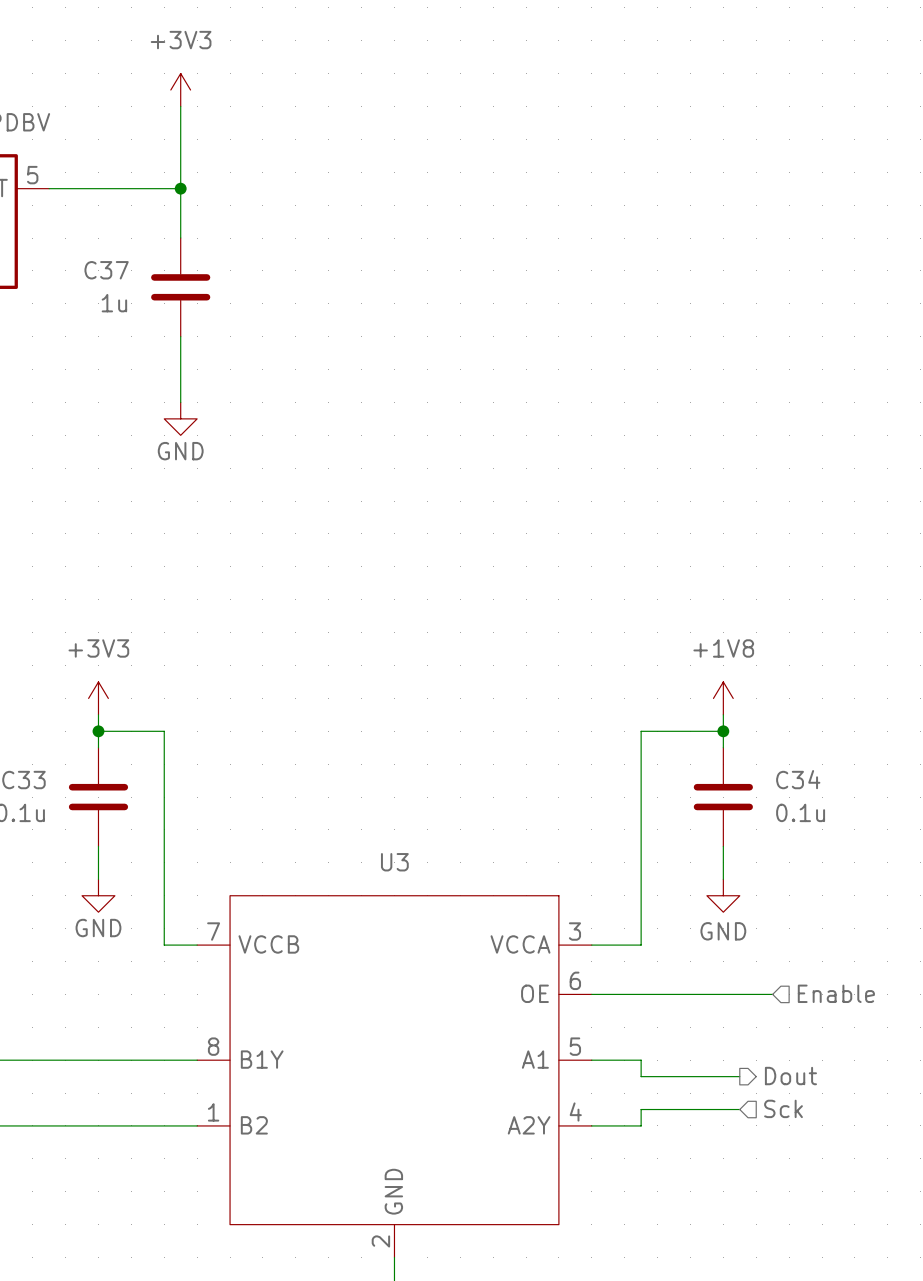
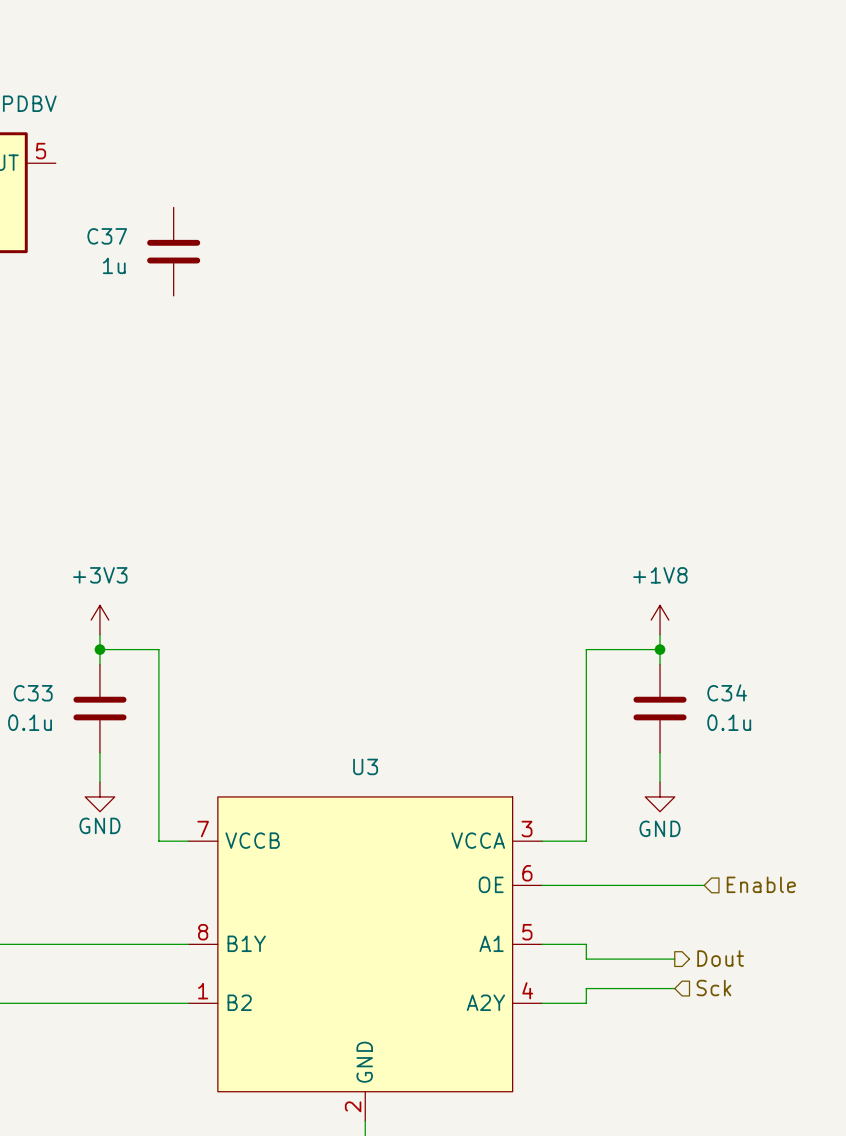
power symbol: +3V3 (180, 90) -> none
wire: (180, 106) (180, 238) -> none
wire: (49, 188) (180, 188) -> none
junction: (180, 188) -> none
wire: (180, 336) (180, 402) -> none
power symbol: GND (180, 418) -> none

